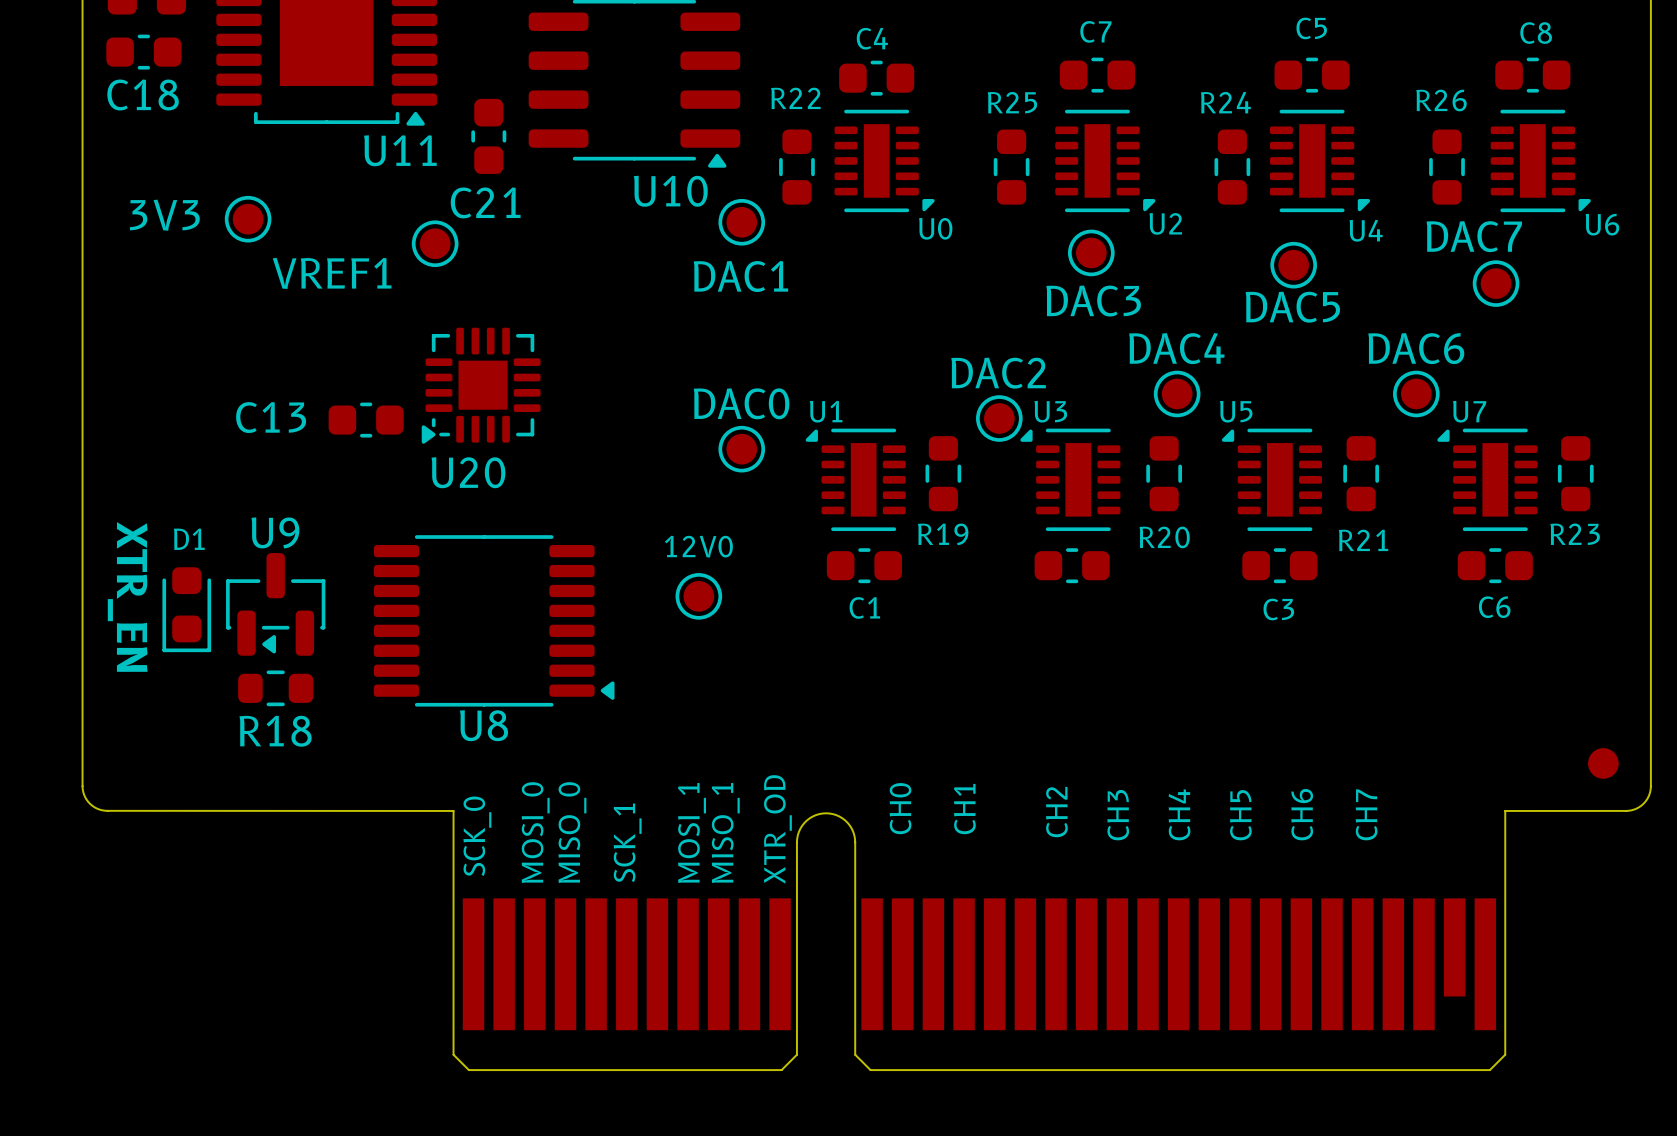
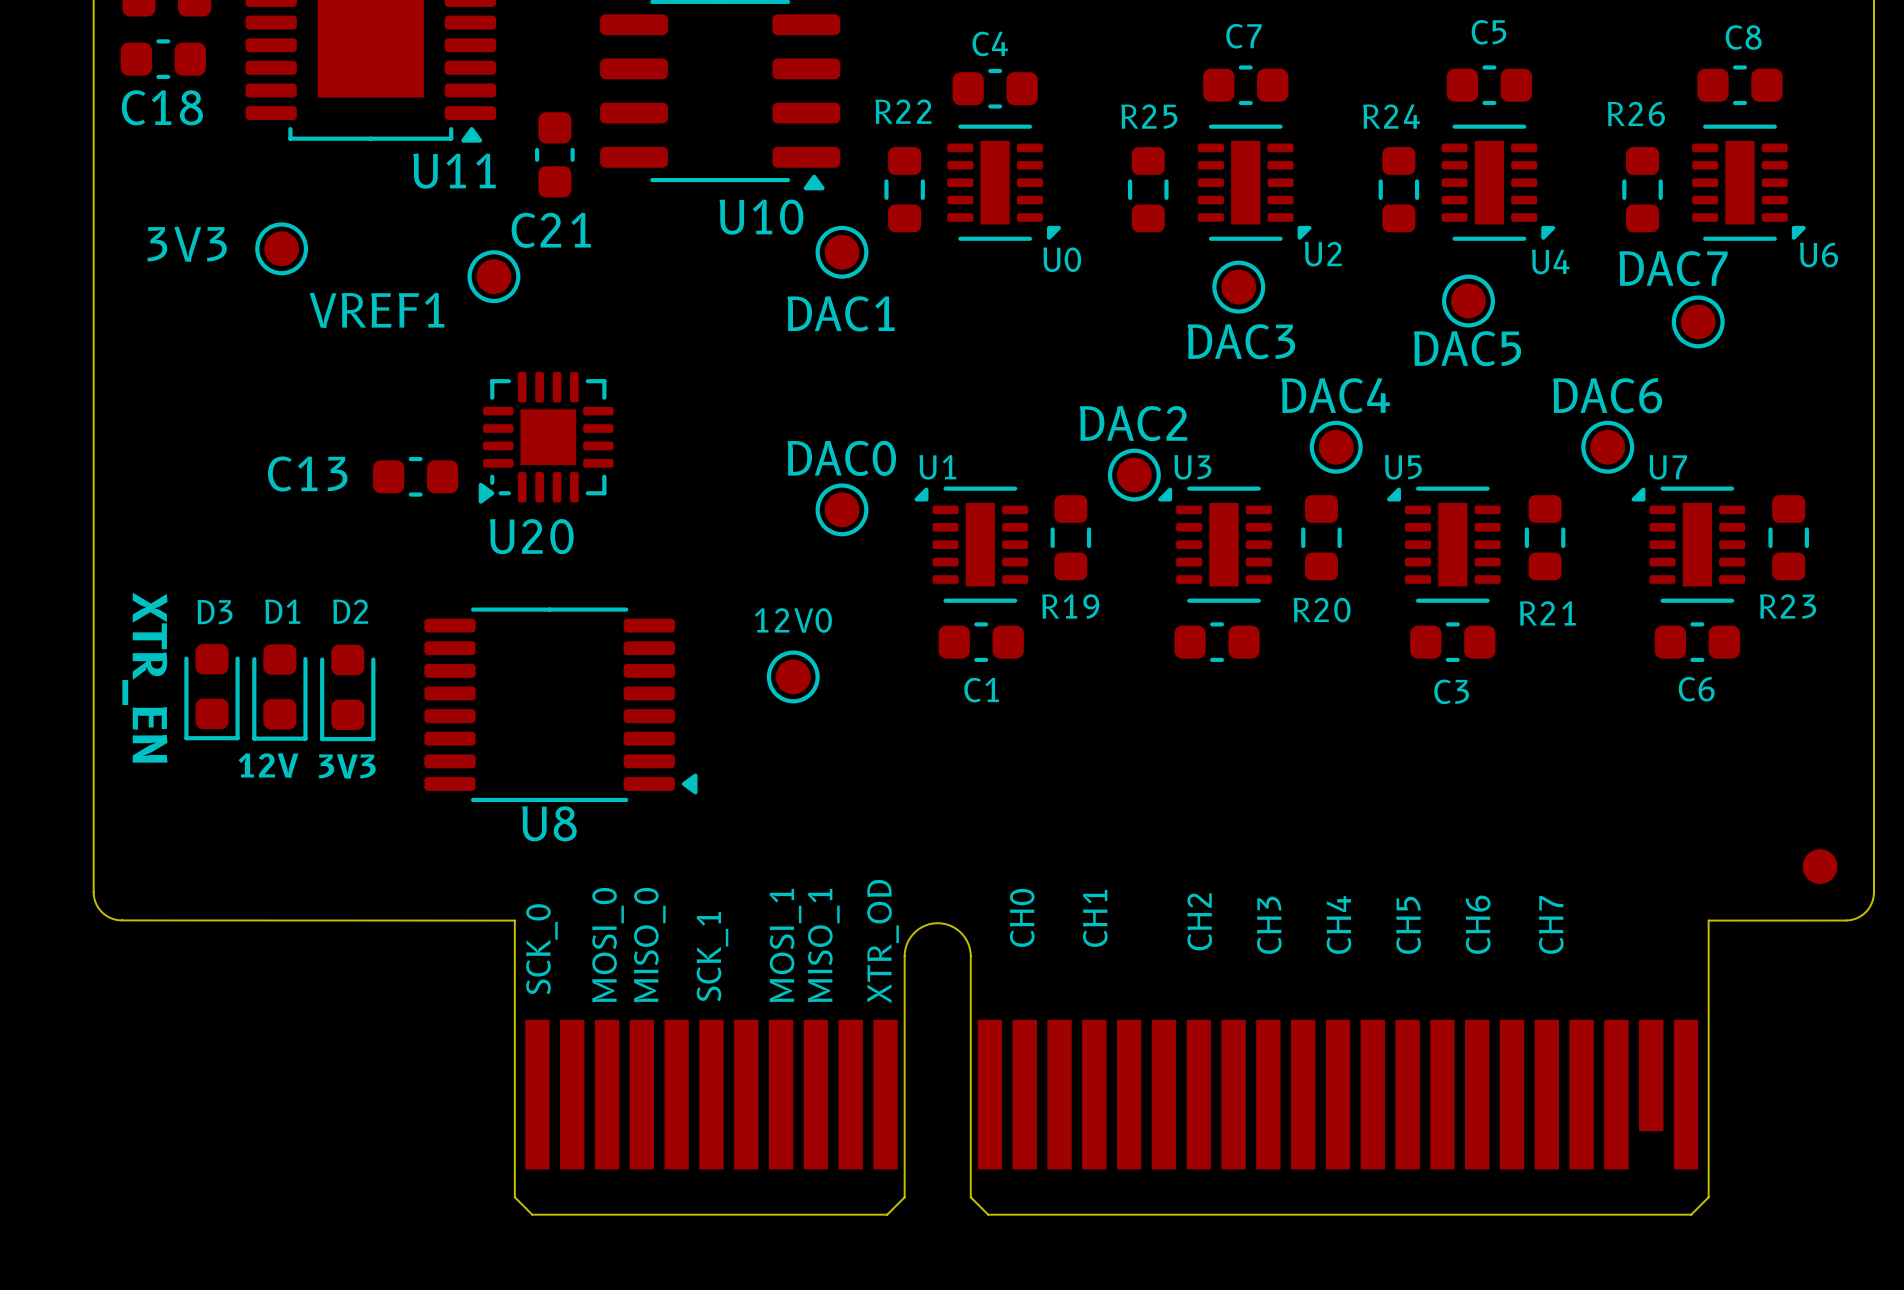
D1 name: D1 (189, 539) -> D3 (214, 612)
U9: (275, 604) -> none
D1: none -> (279, 692)
D2: none -> (347, 692)
text: none -> 12V (268, 765)
text: none -> 3V3 (347, 766)
R18: (275, 688) -> none

